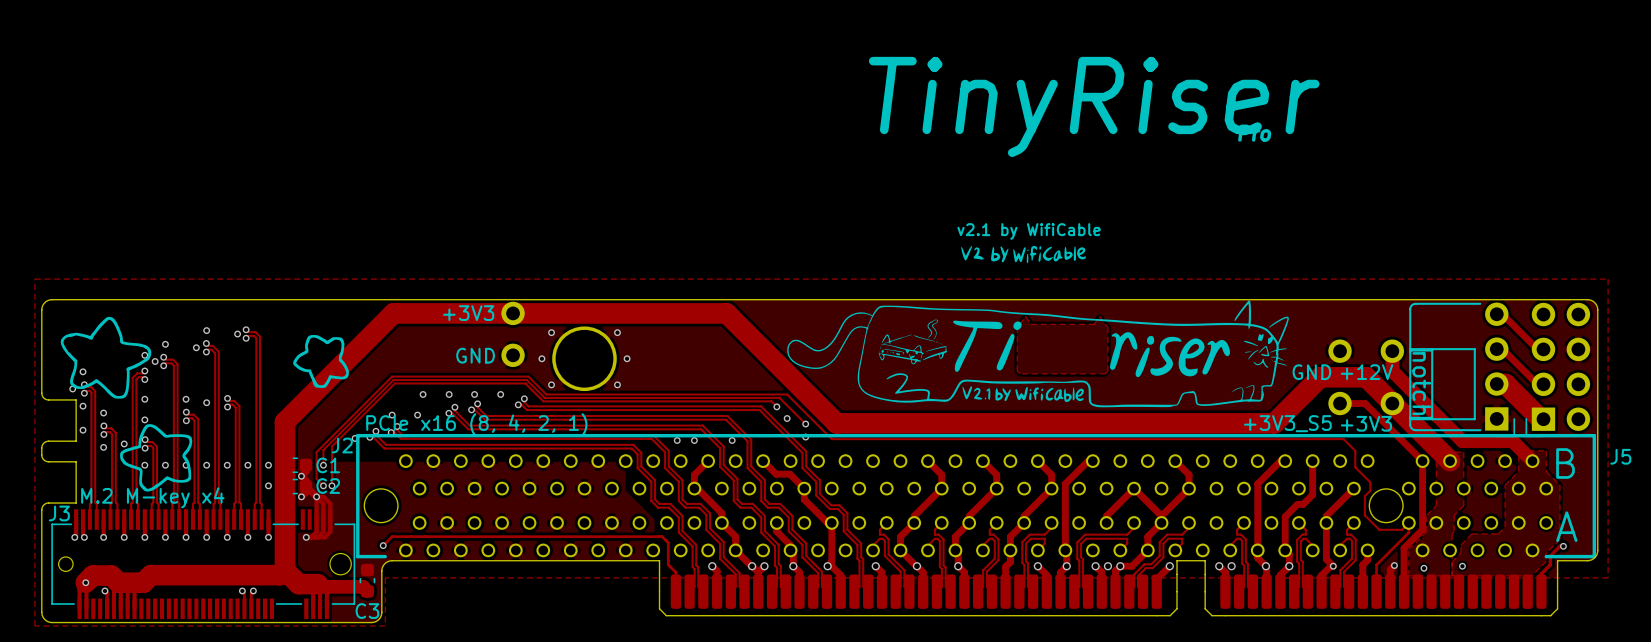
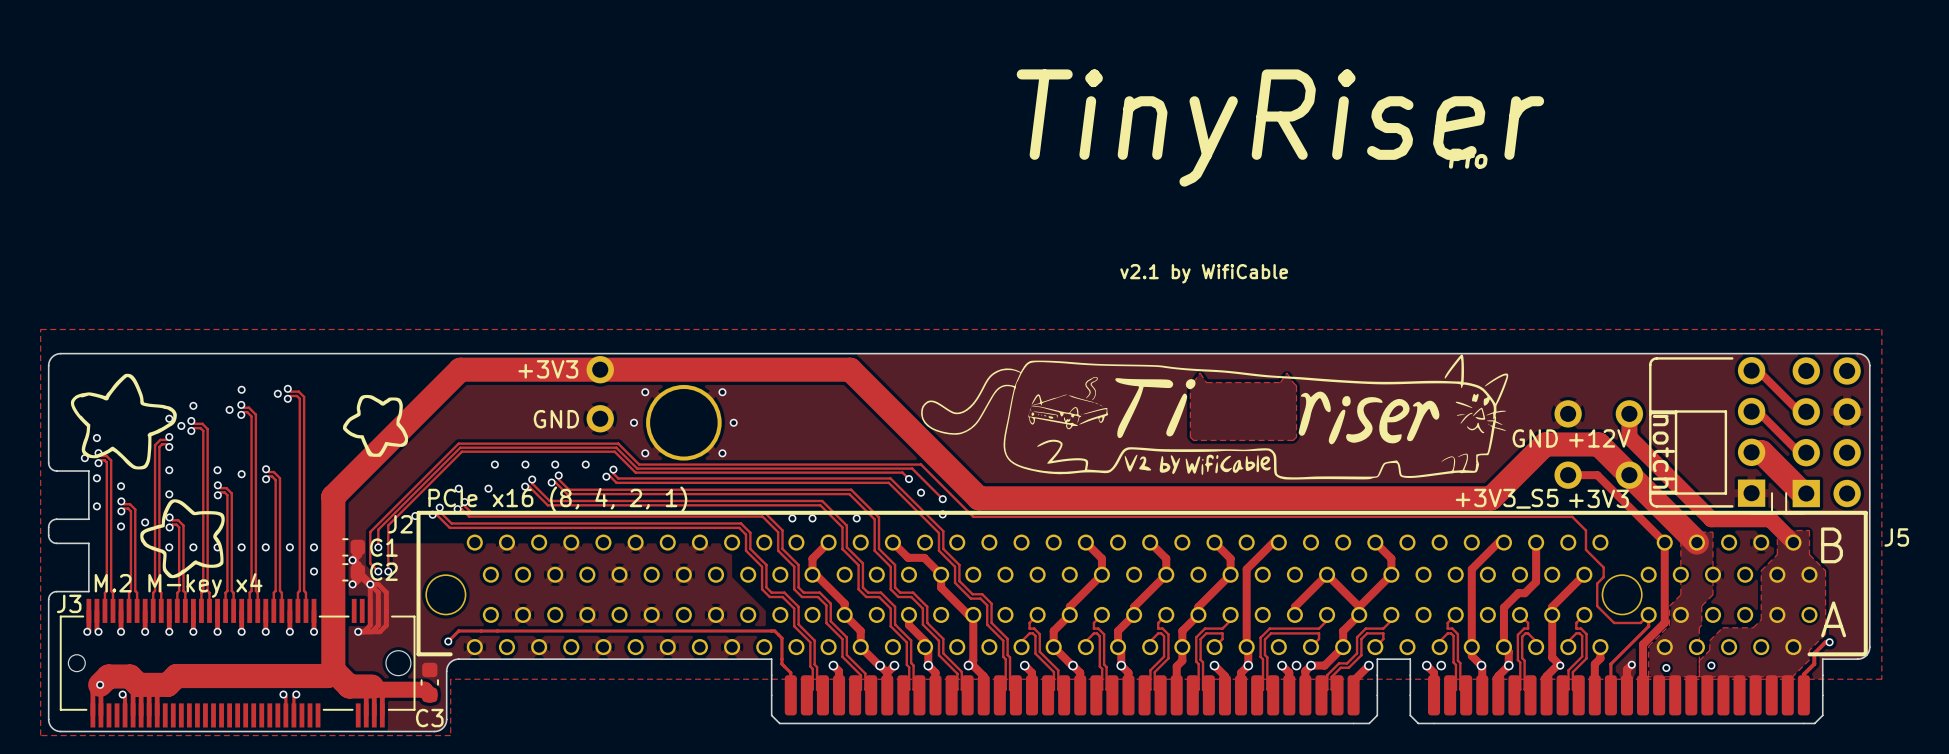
drawing position: (1023, 254) -> (1197, 464)
drawing: [962, 386, 1084, 403] -> none

